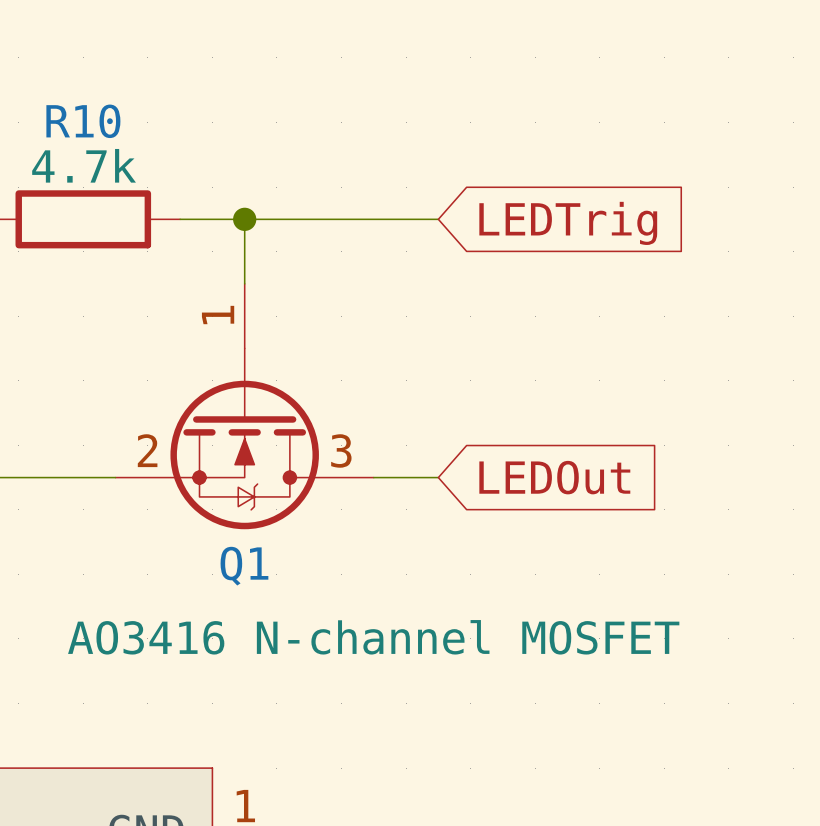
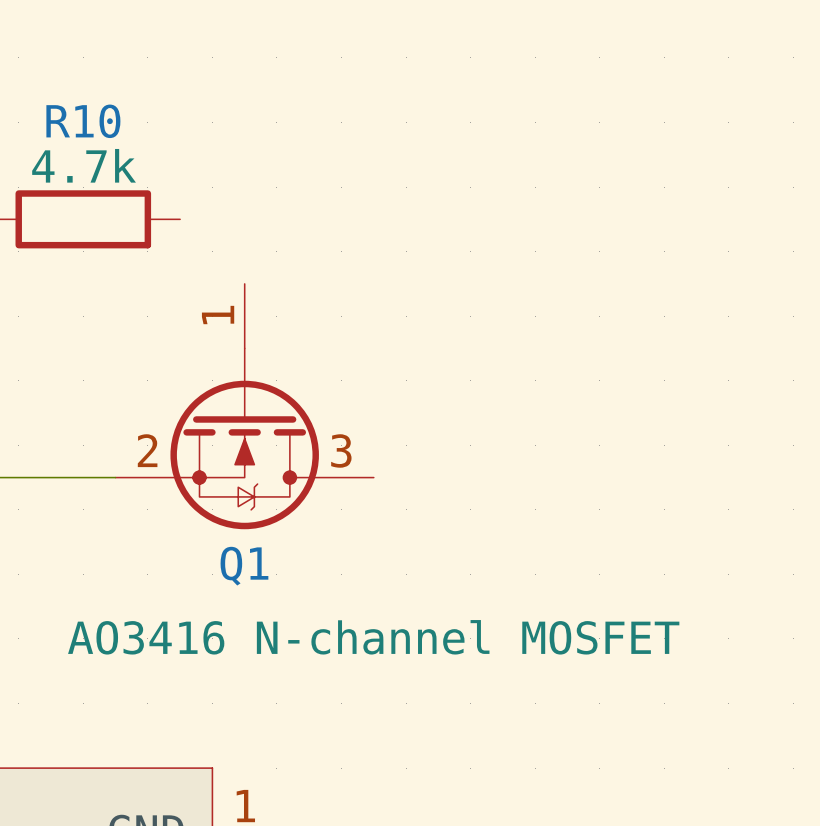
wire: (180, 219) (438, 219) -> none
wire: (244, 219) (244, 283) -> none
junction: (244, 219) -> none
global label: LEDTrig (568, 223) -> none
wire: (373, 477) (438, 477) -> none
global label: LEDOut (554, 477) -> none

